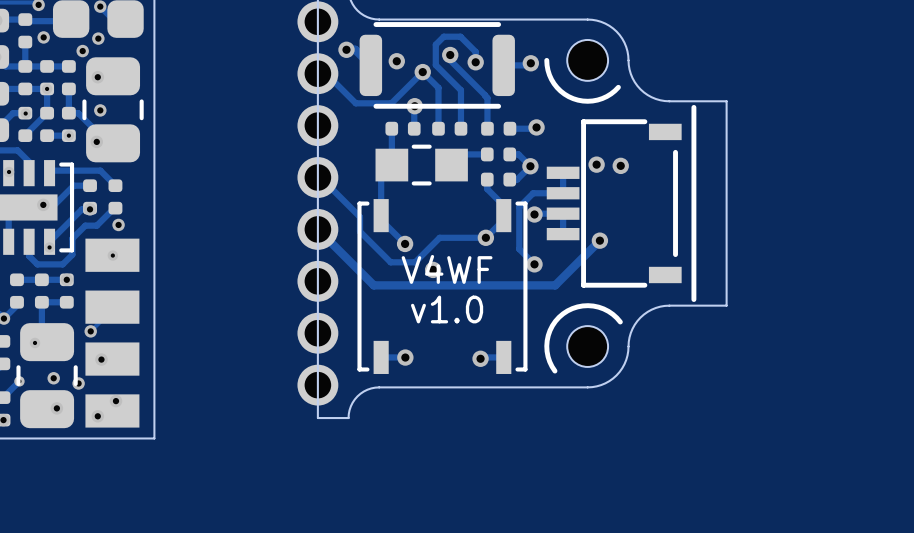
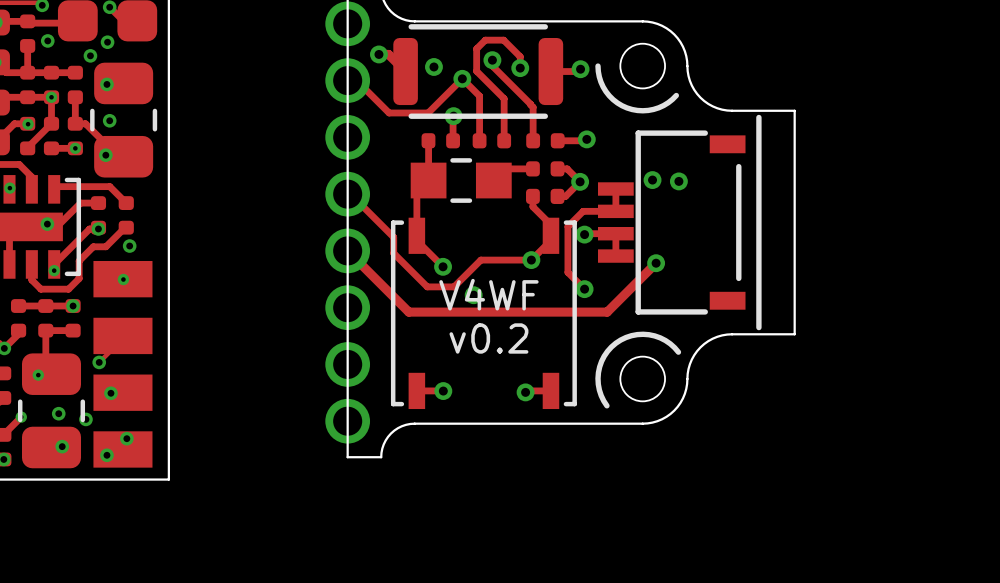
text: v1.0 (447, 309) -> v0.2 (488, 338)

